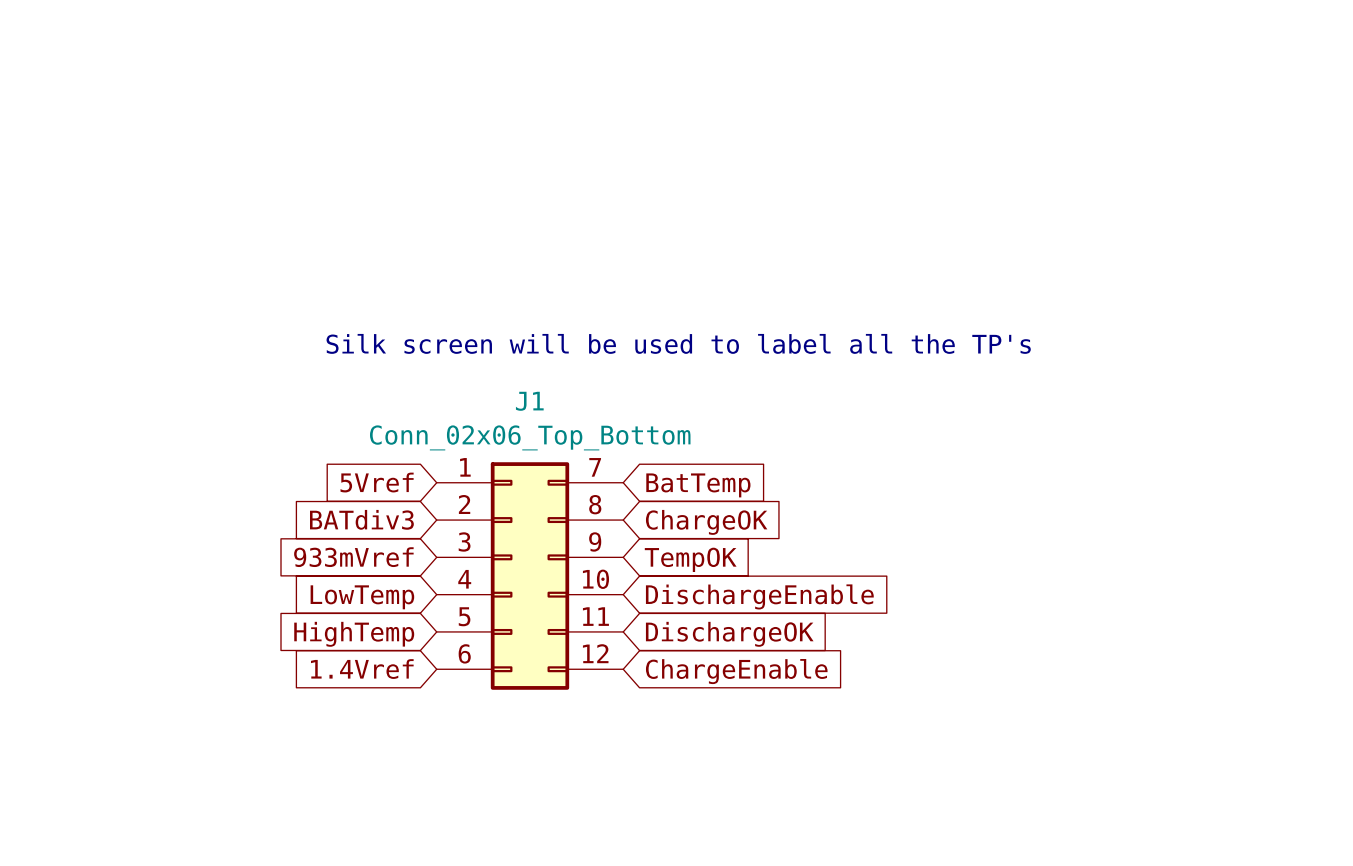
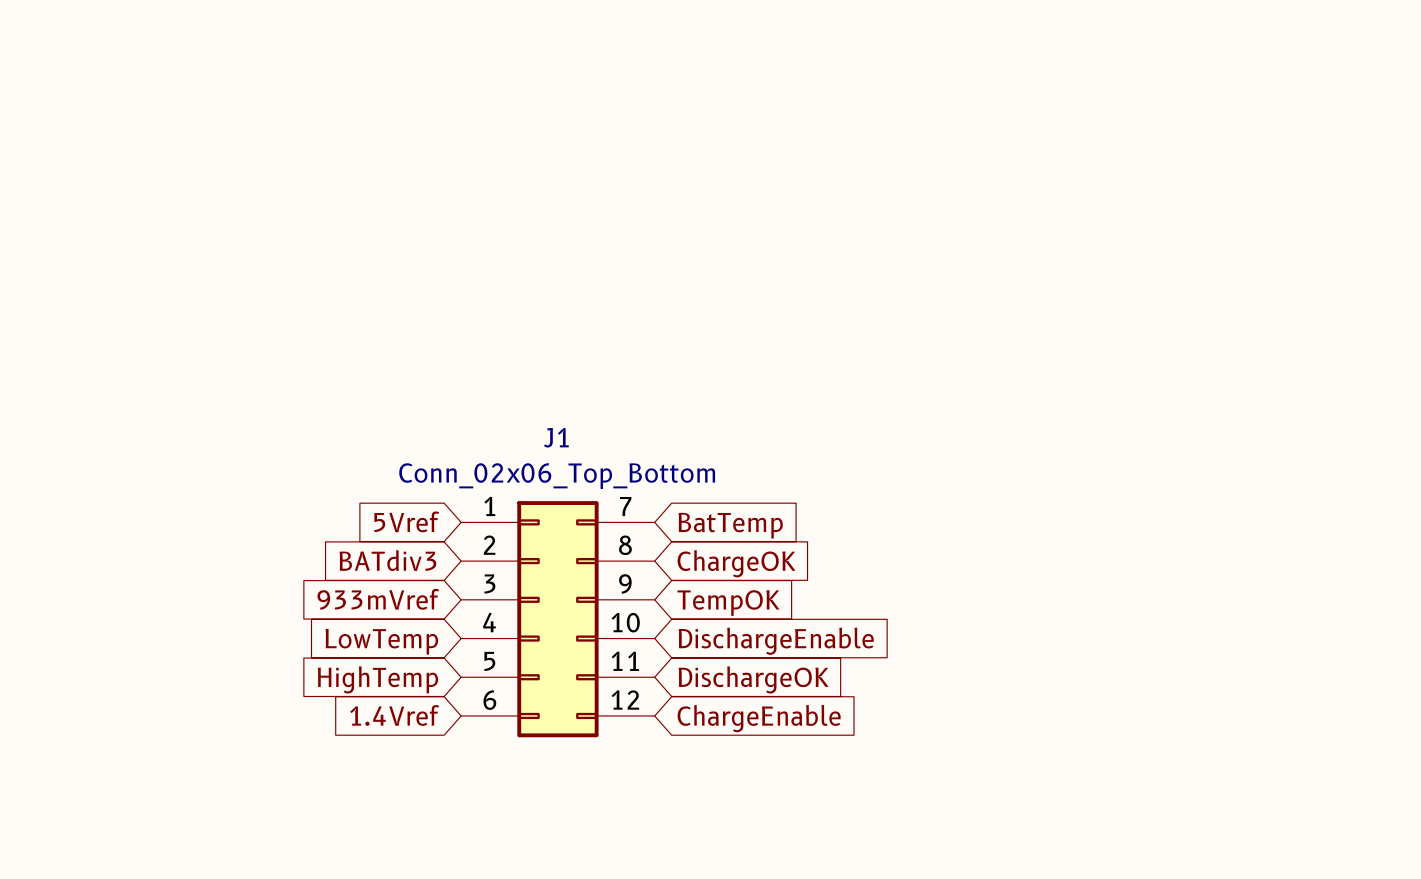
text: Silk screen will be used to label all the TP's (678, 343) -> none

